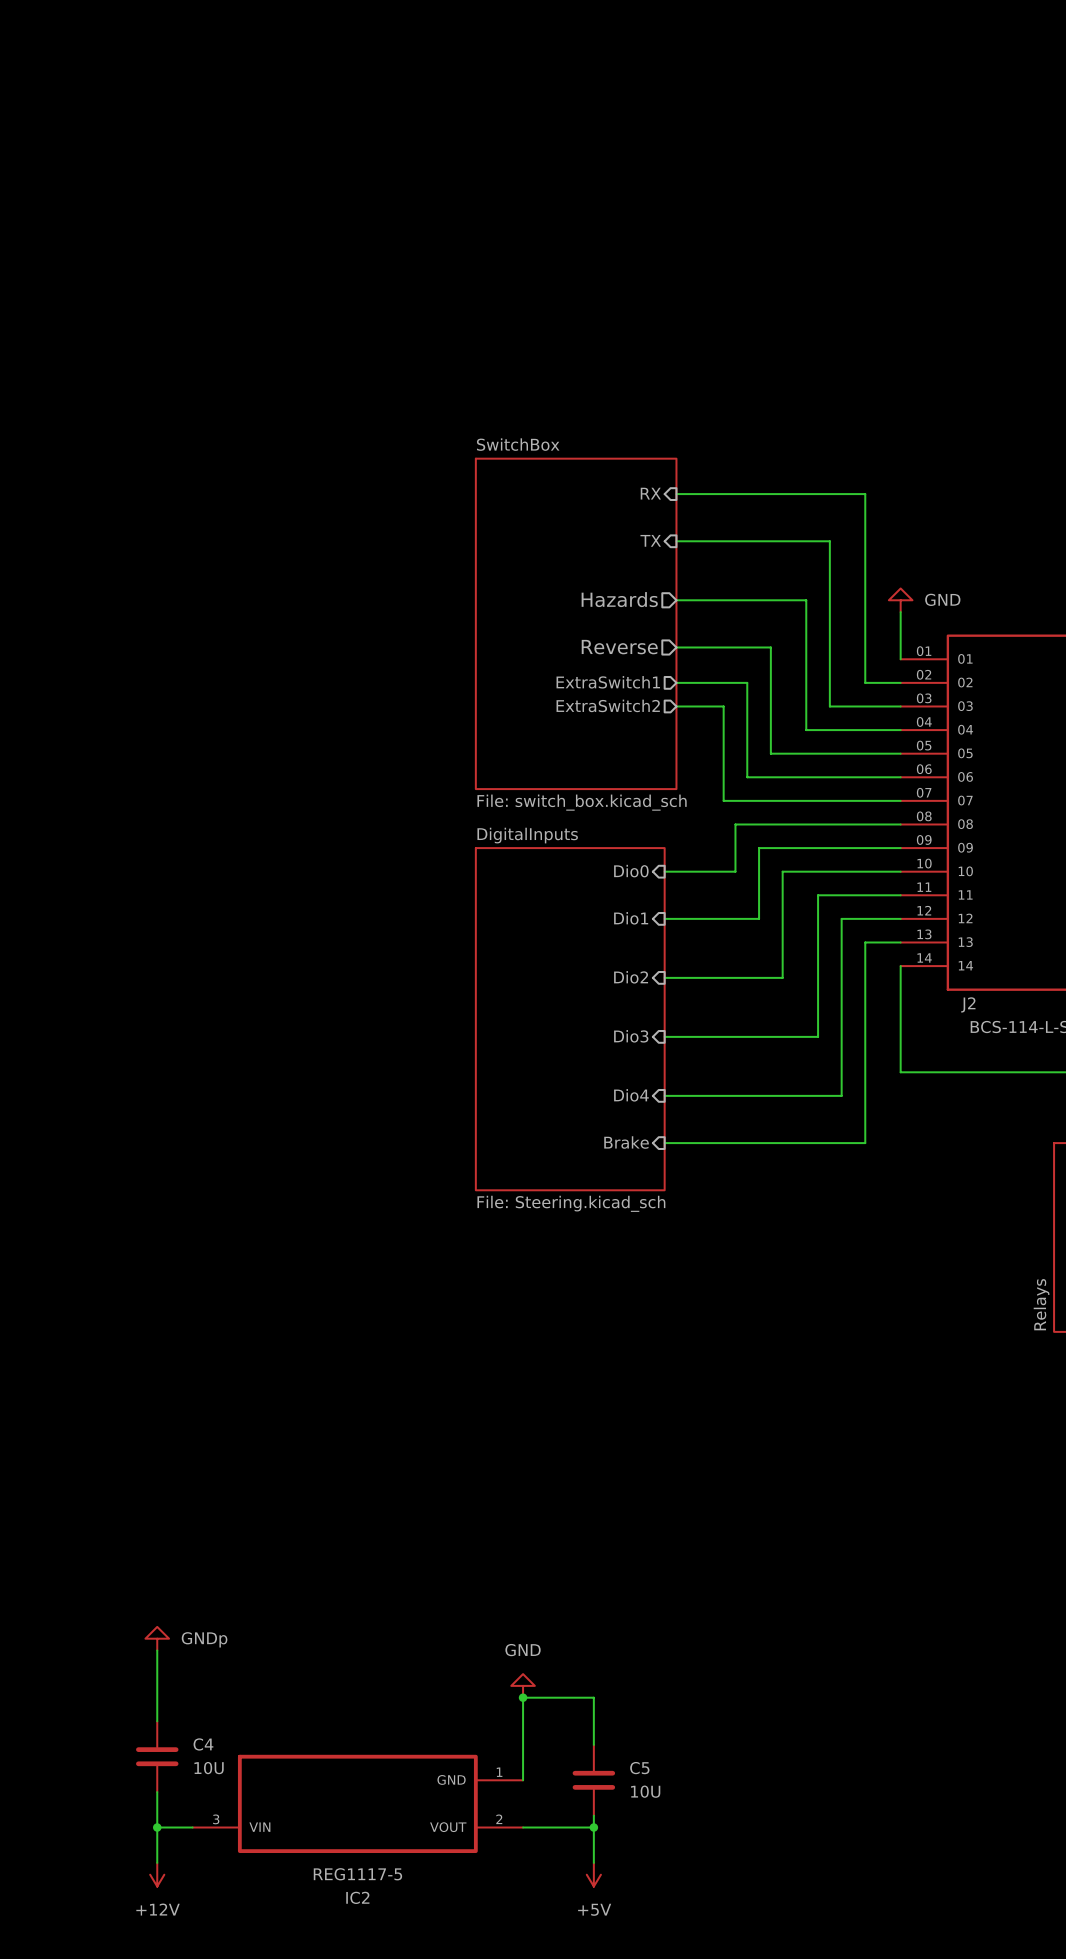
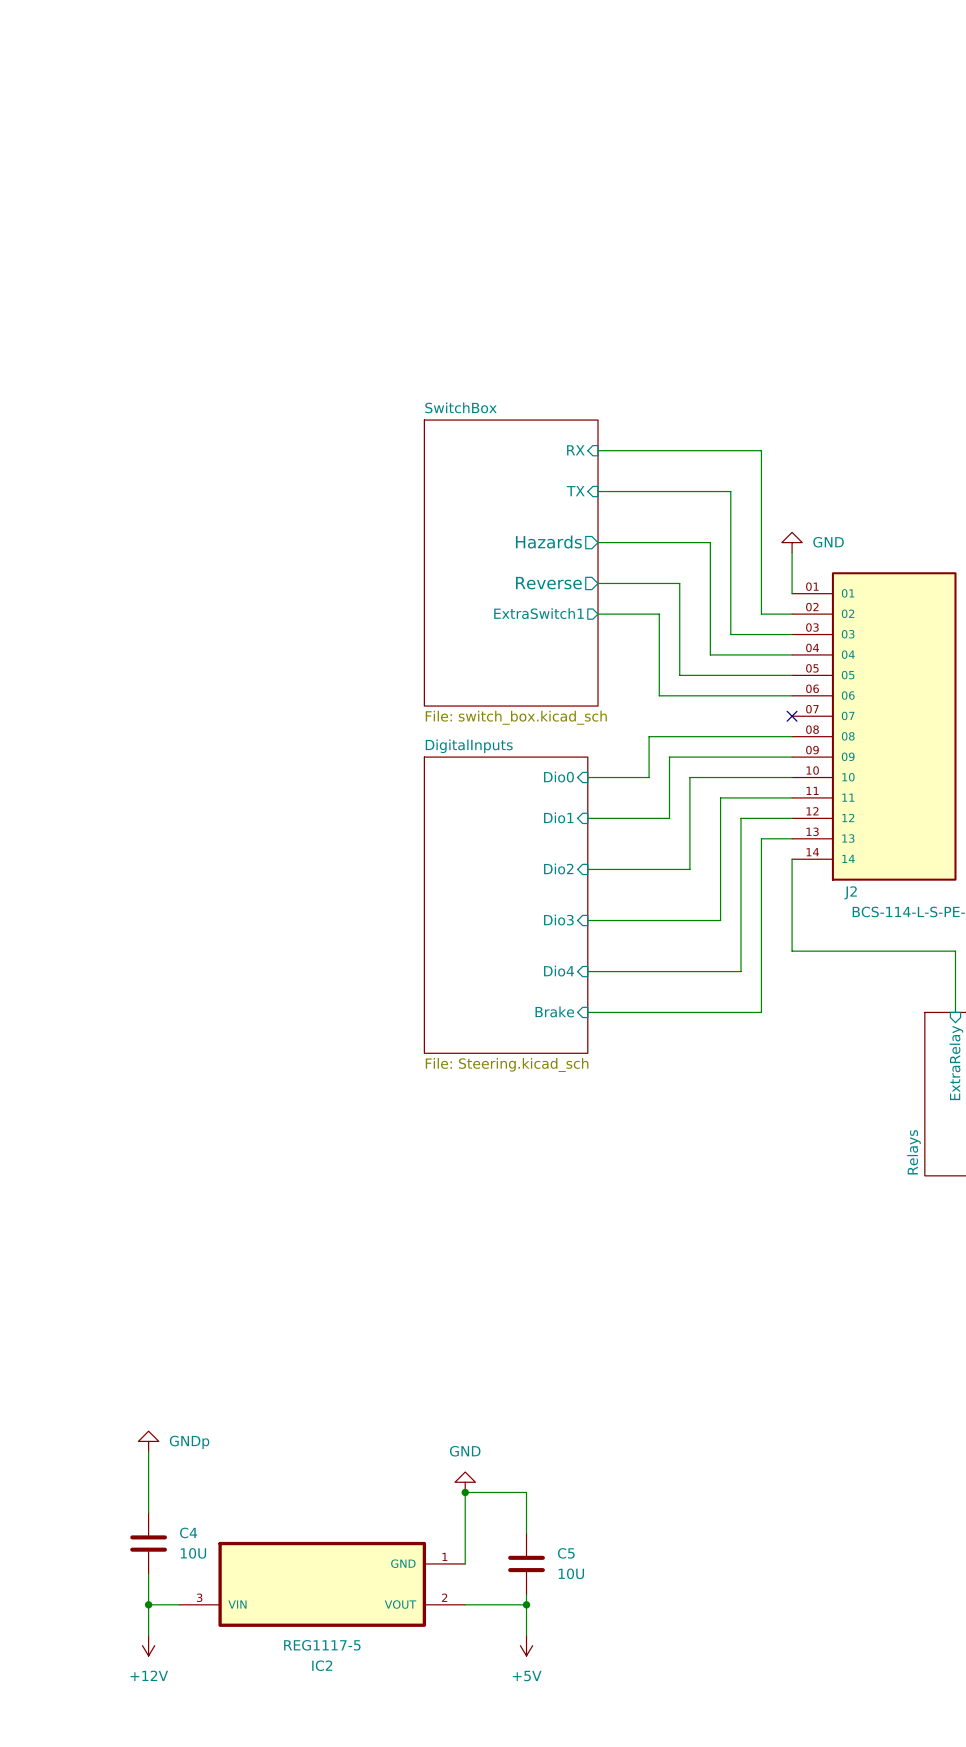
sheet pin: ExtraSwitch2 (608, 705) -> none
wire: (676, 706) (723, 706) (723, 800) (900, 800) -> none
no-connect mark: none -> (792, 716)

